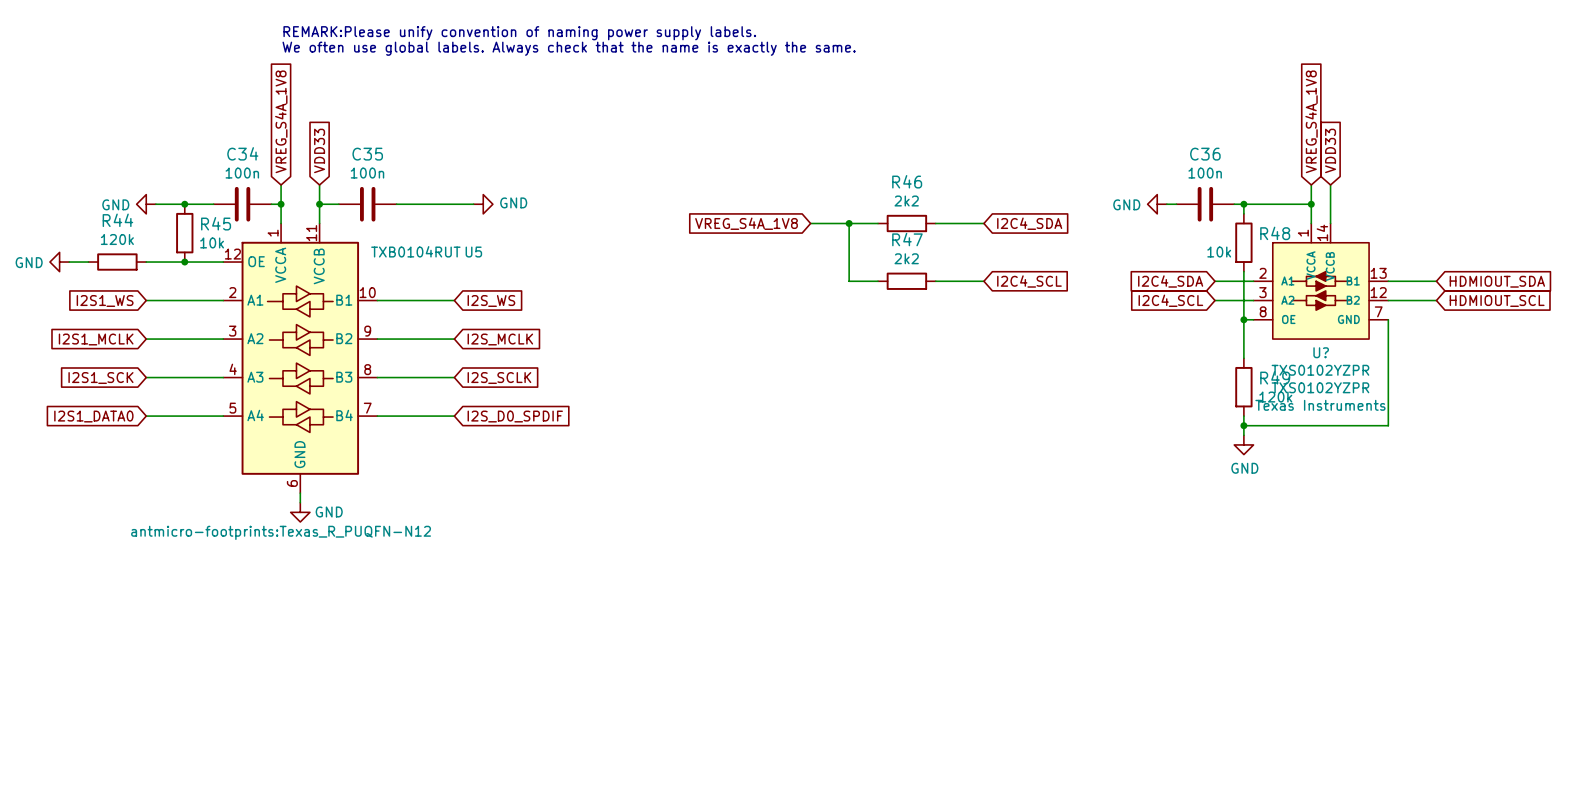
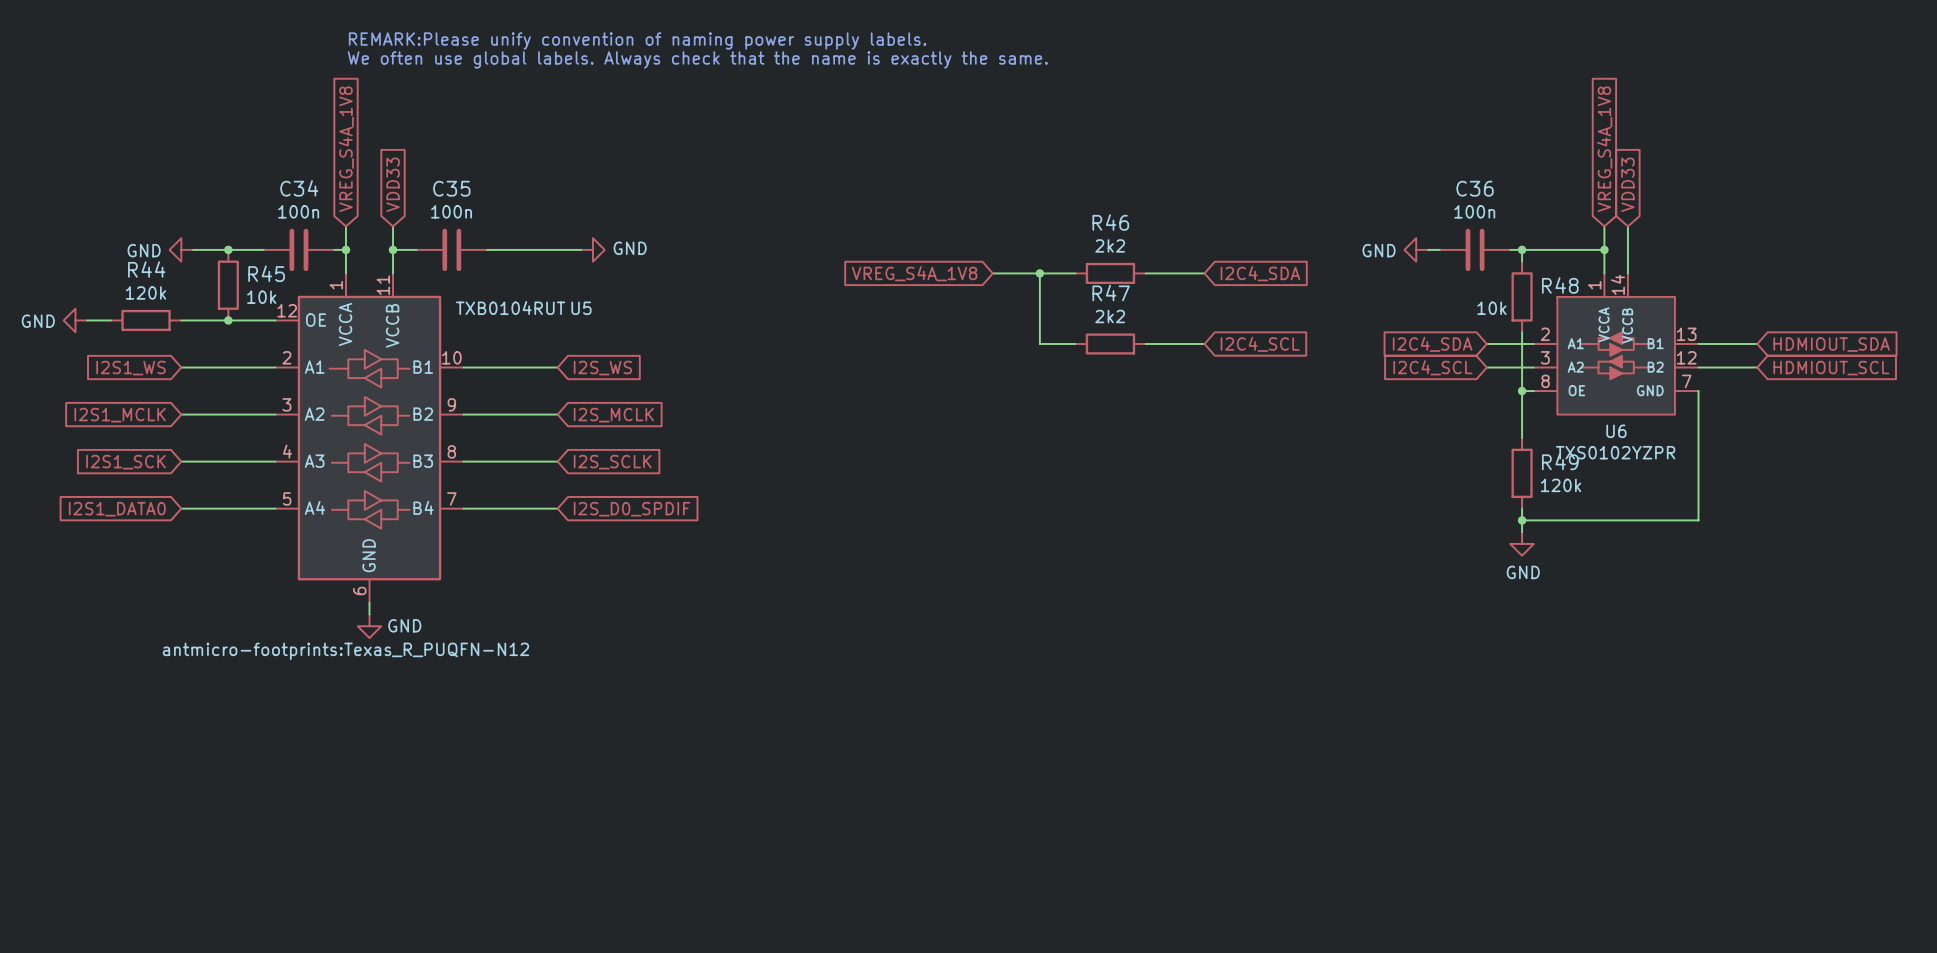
U? name: U? (1321, 352) -> U6 (1616, 431)
U? text: TXS0102YZPR (1320, 387) -> none
U? text: Texas Instruments (1320, 405) -> none

